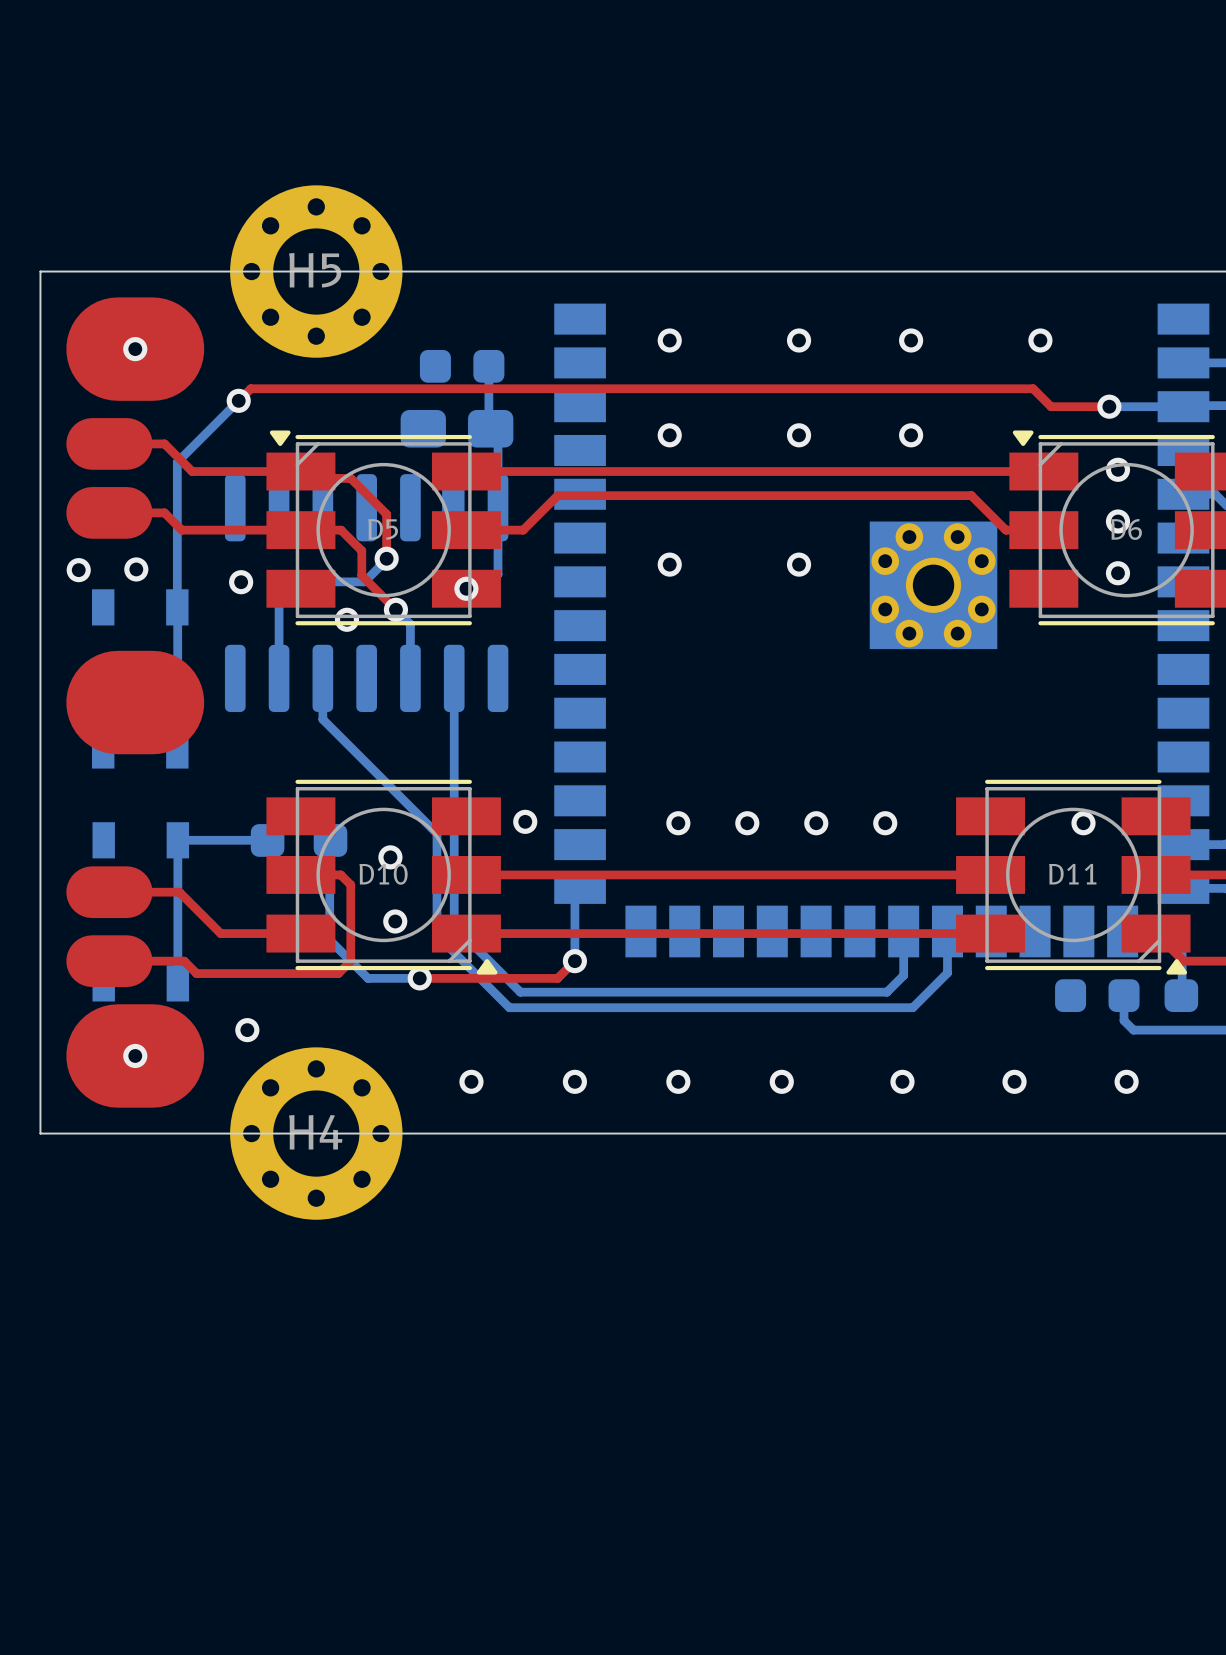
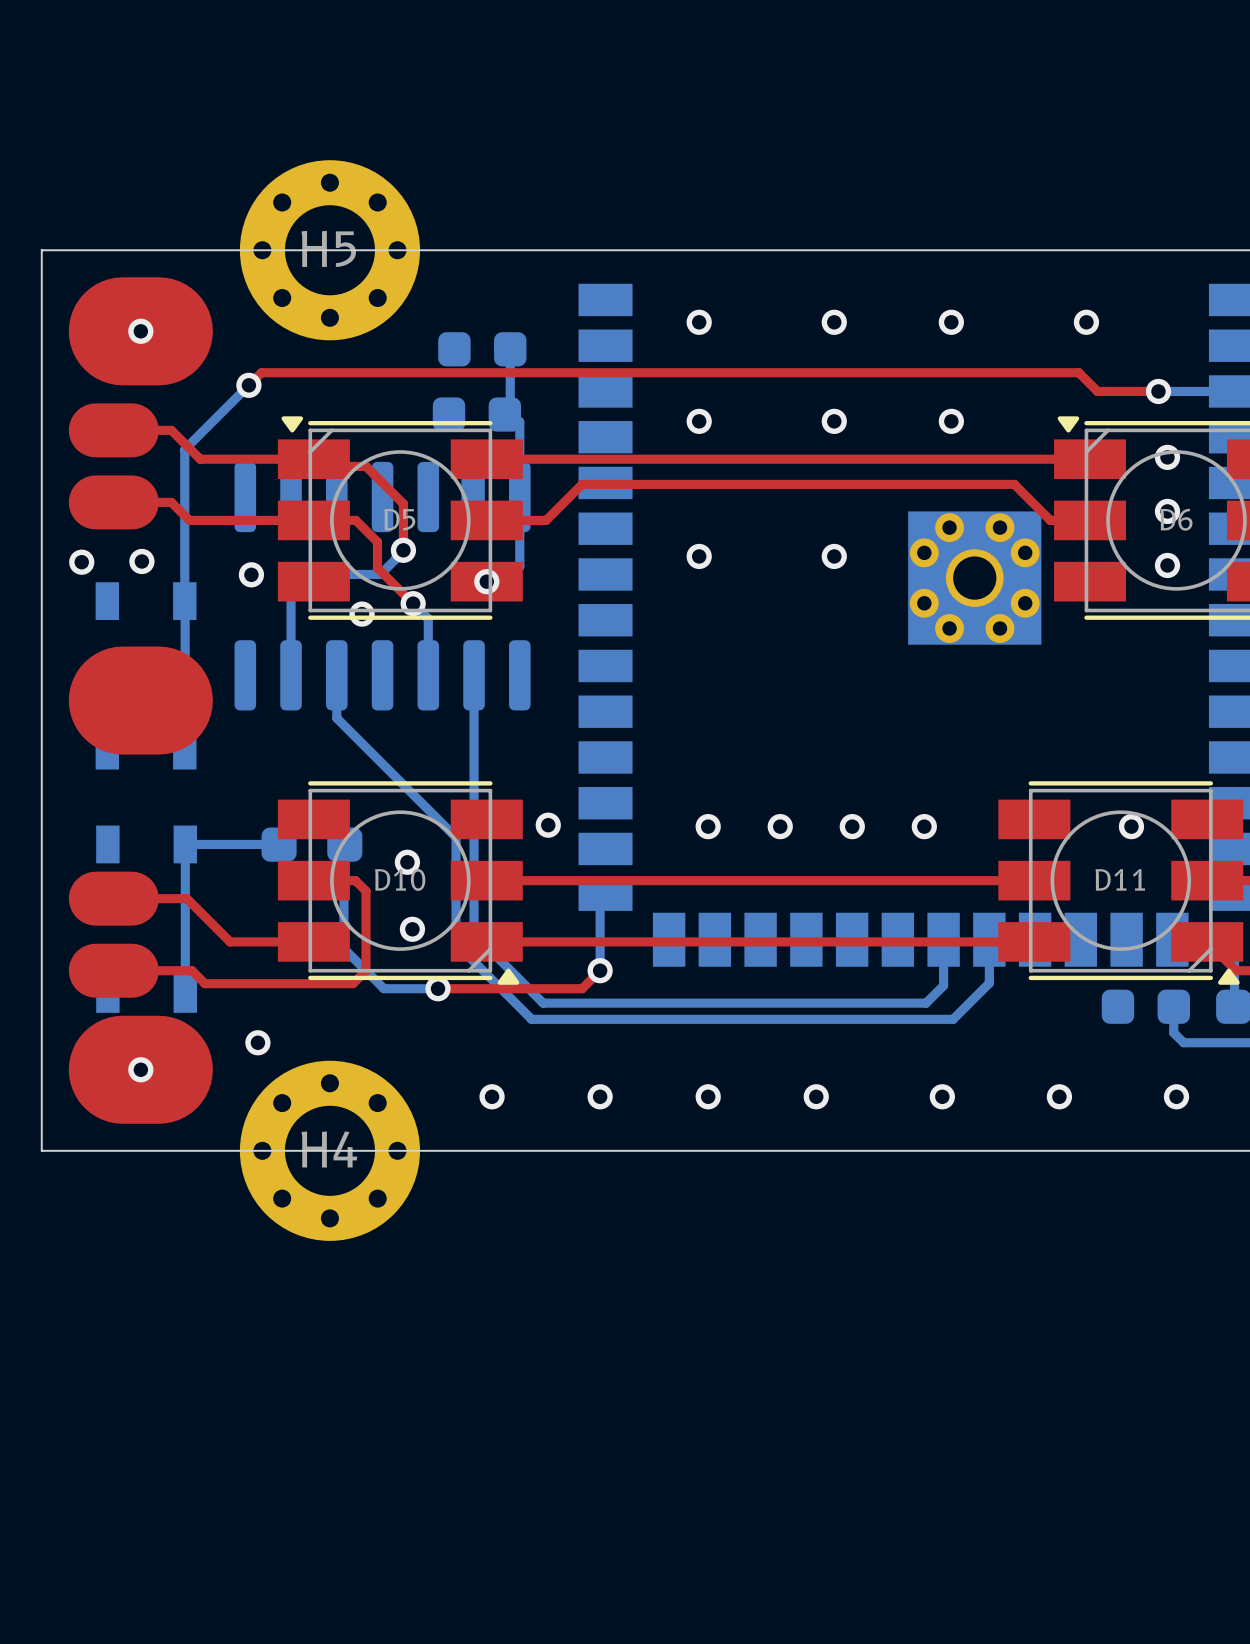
part footprint: [400, 409, 514, 448] -> [432, 397, 522, 432]

